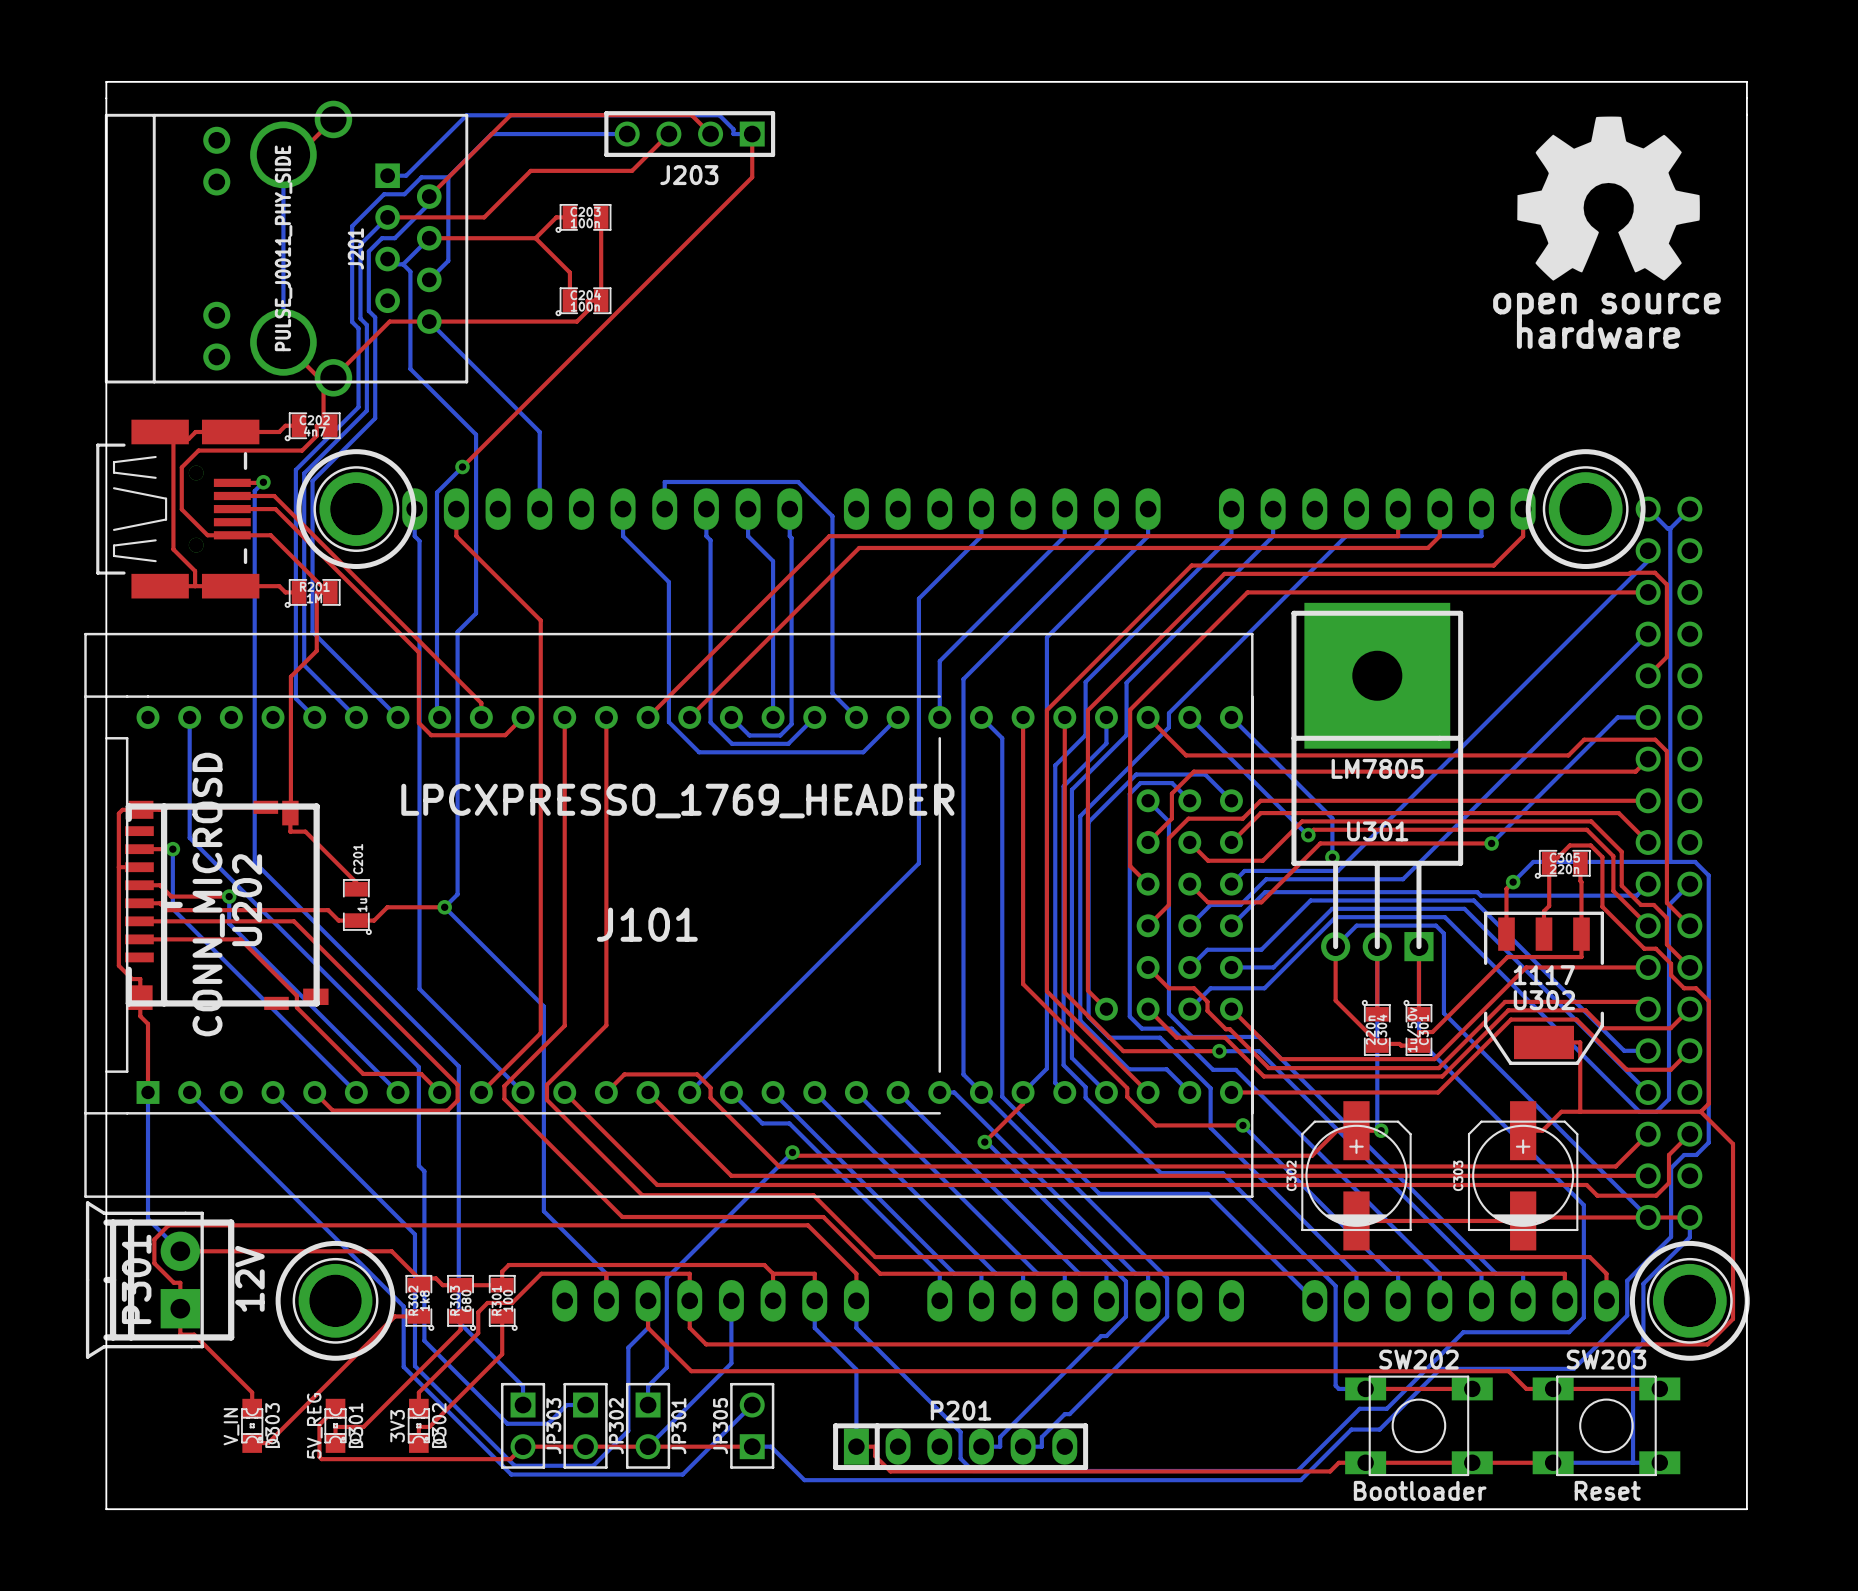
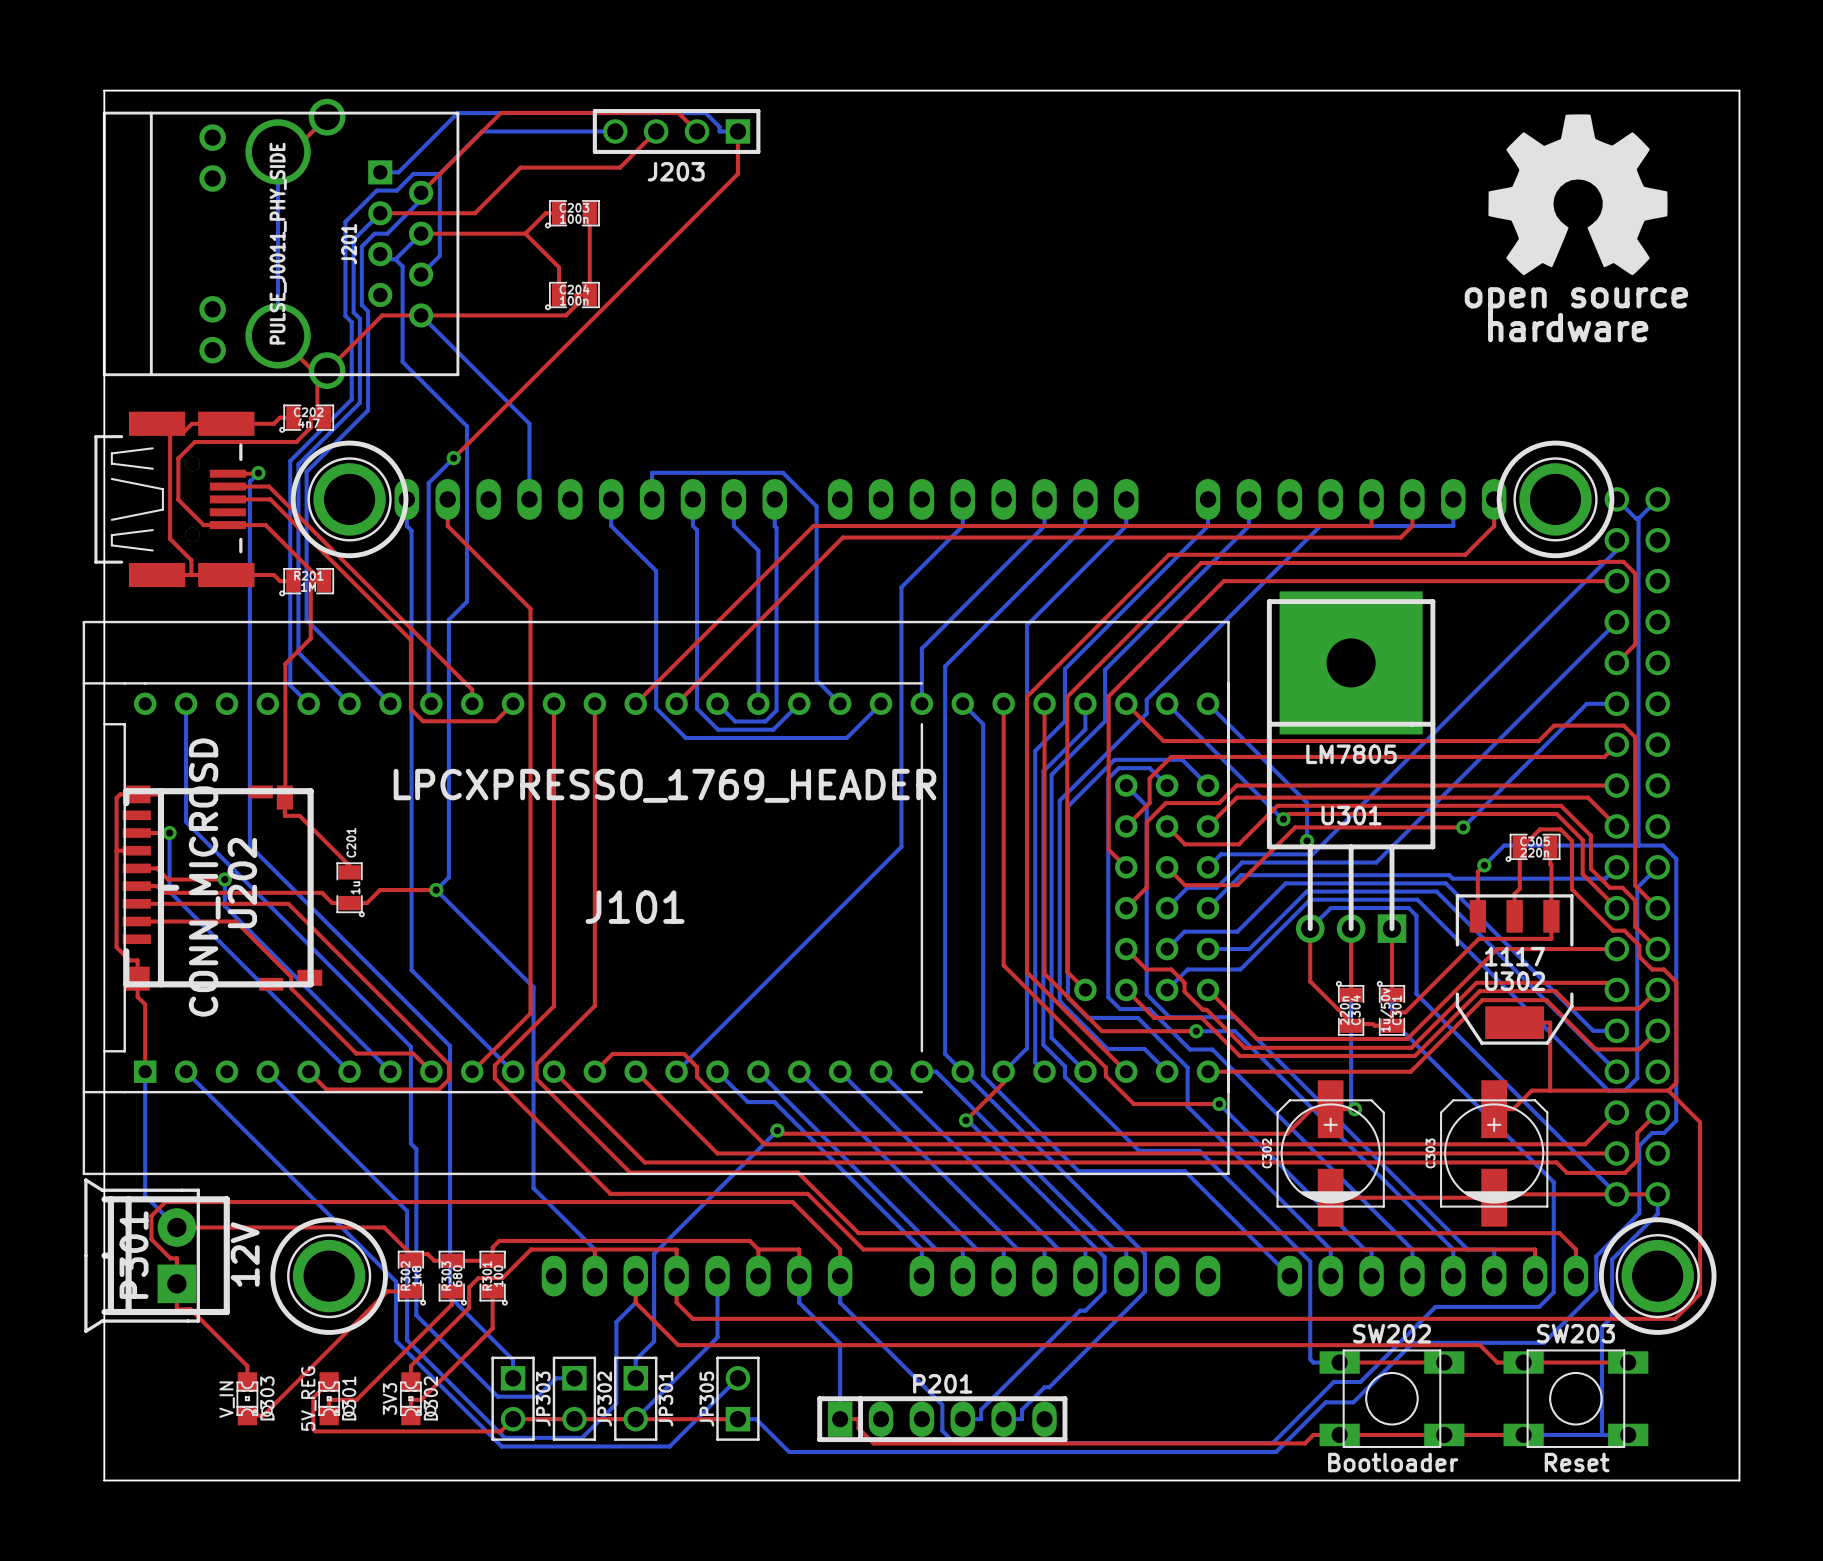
board edge: (106, 92) (106, 81) (1746, 81) (1746, 1509) -> (104, 90) (1739, 90) (1739, 1480) (1713, 1480)

